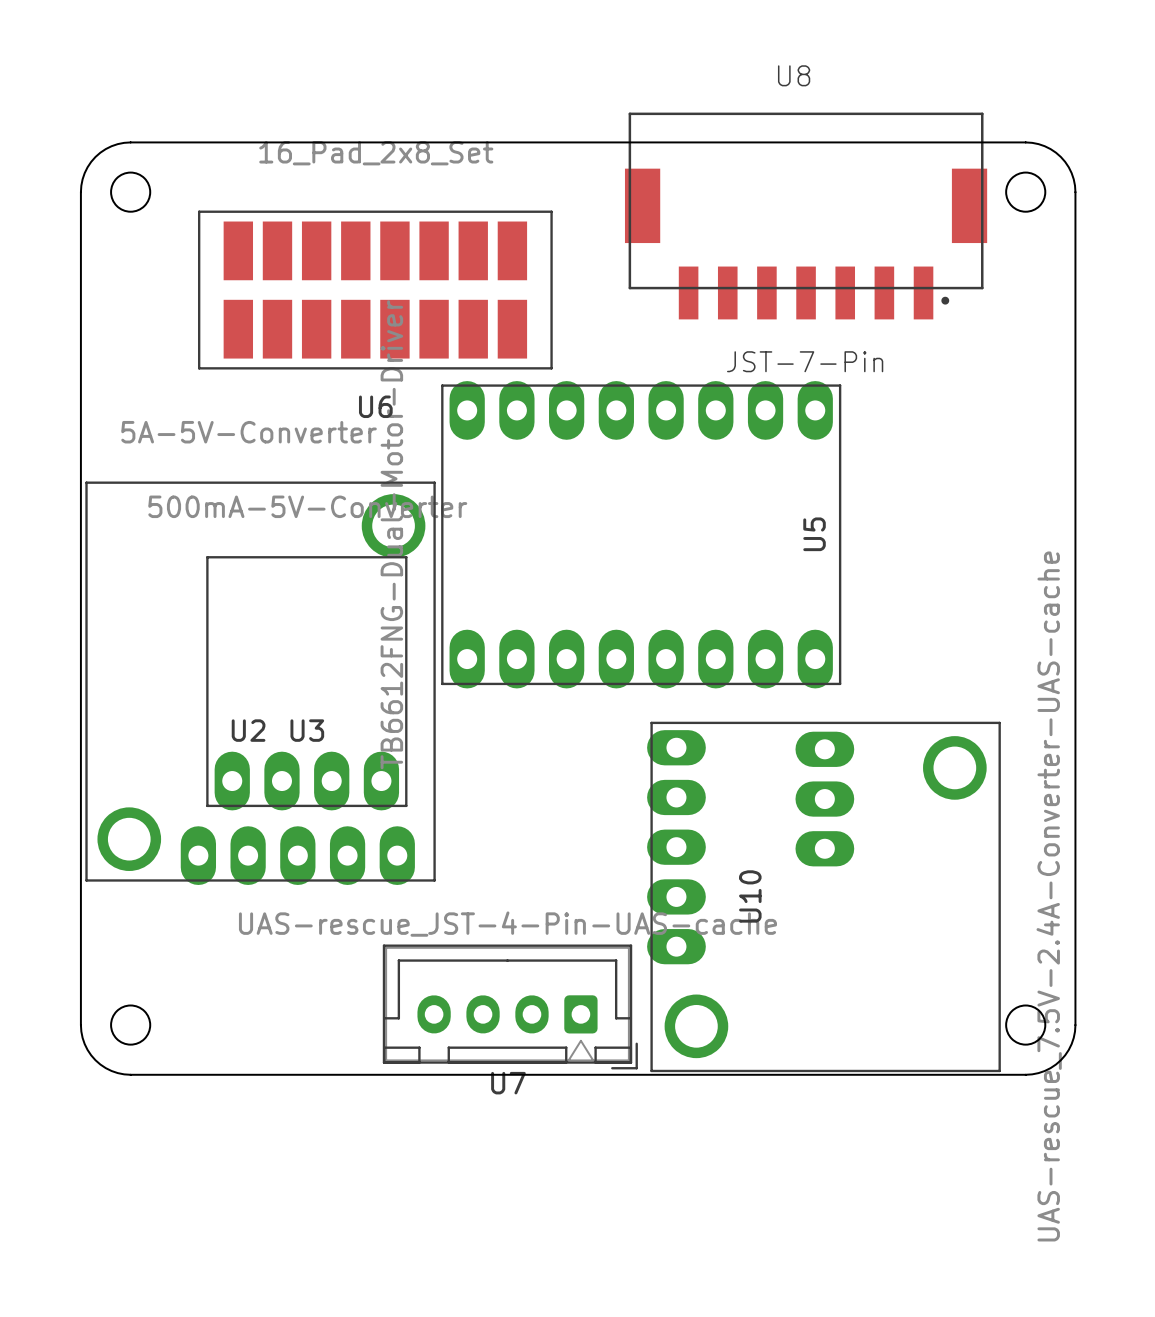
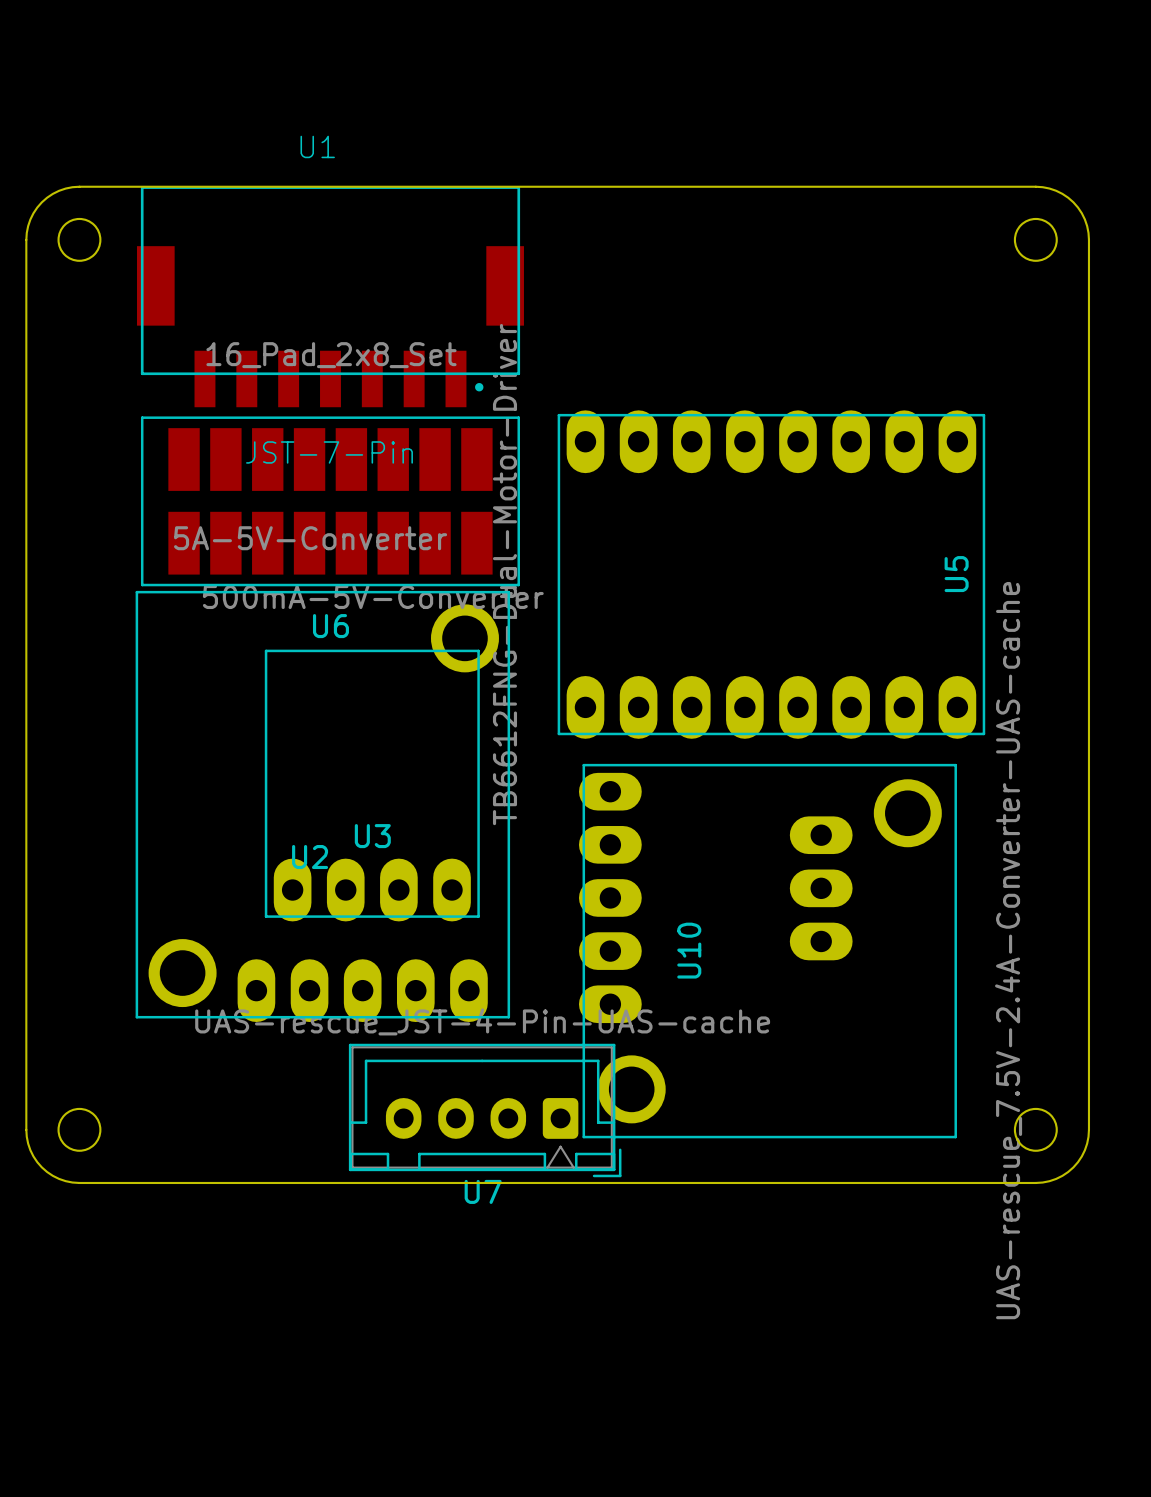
U8: JST-7-Pin (806, 216) -> none
U1: none -> JST-7-Pin (330, 296)
U6 position: (375, 290) -> (330, 501)
U5 position: (641, 534) -> (771, 574)
U2 position: (260, 683) -> (322, 806)
U3 position: (306, 683) -> (372, 785)
U10 position: (823, 896) -> (767, 951)

